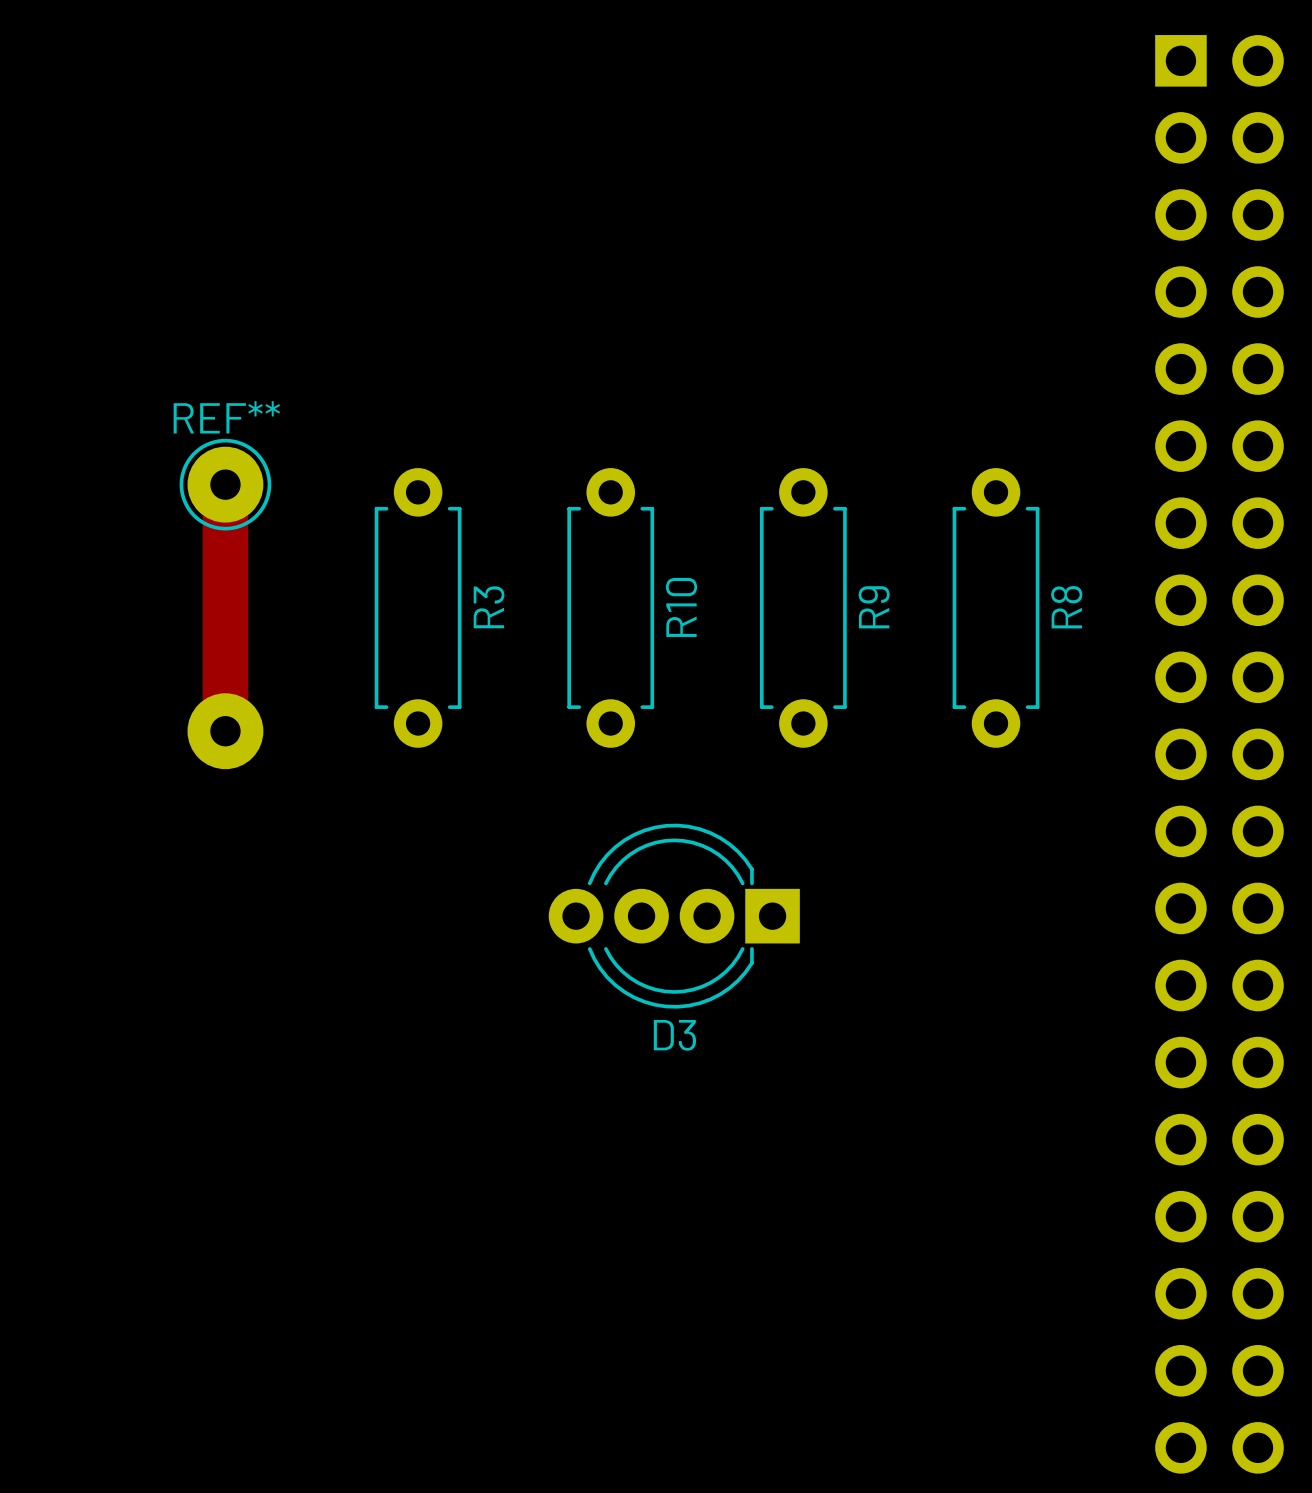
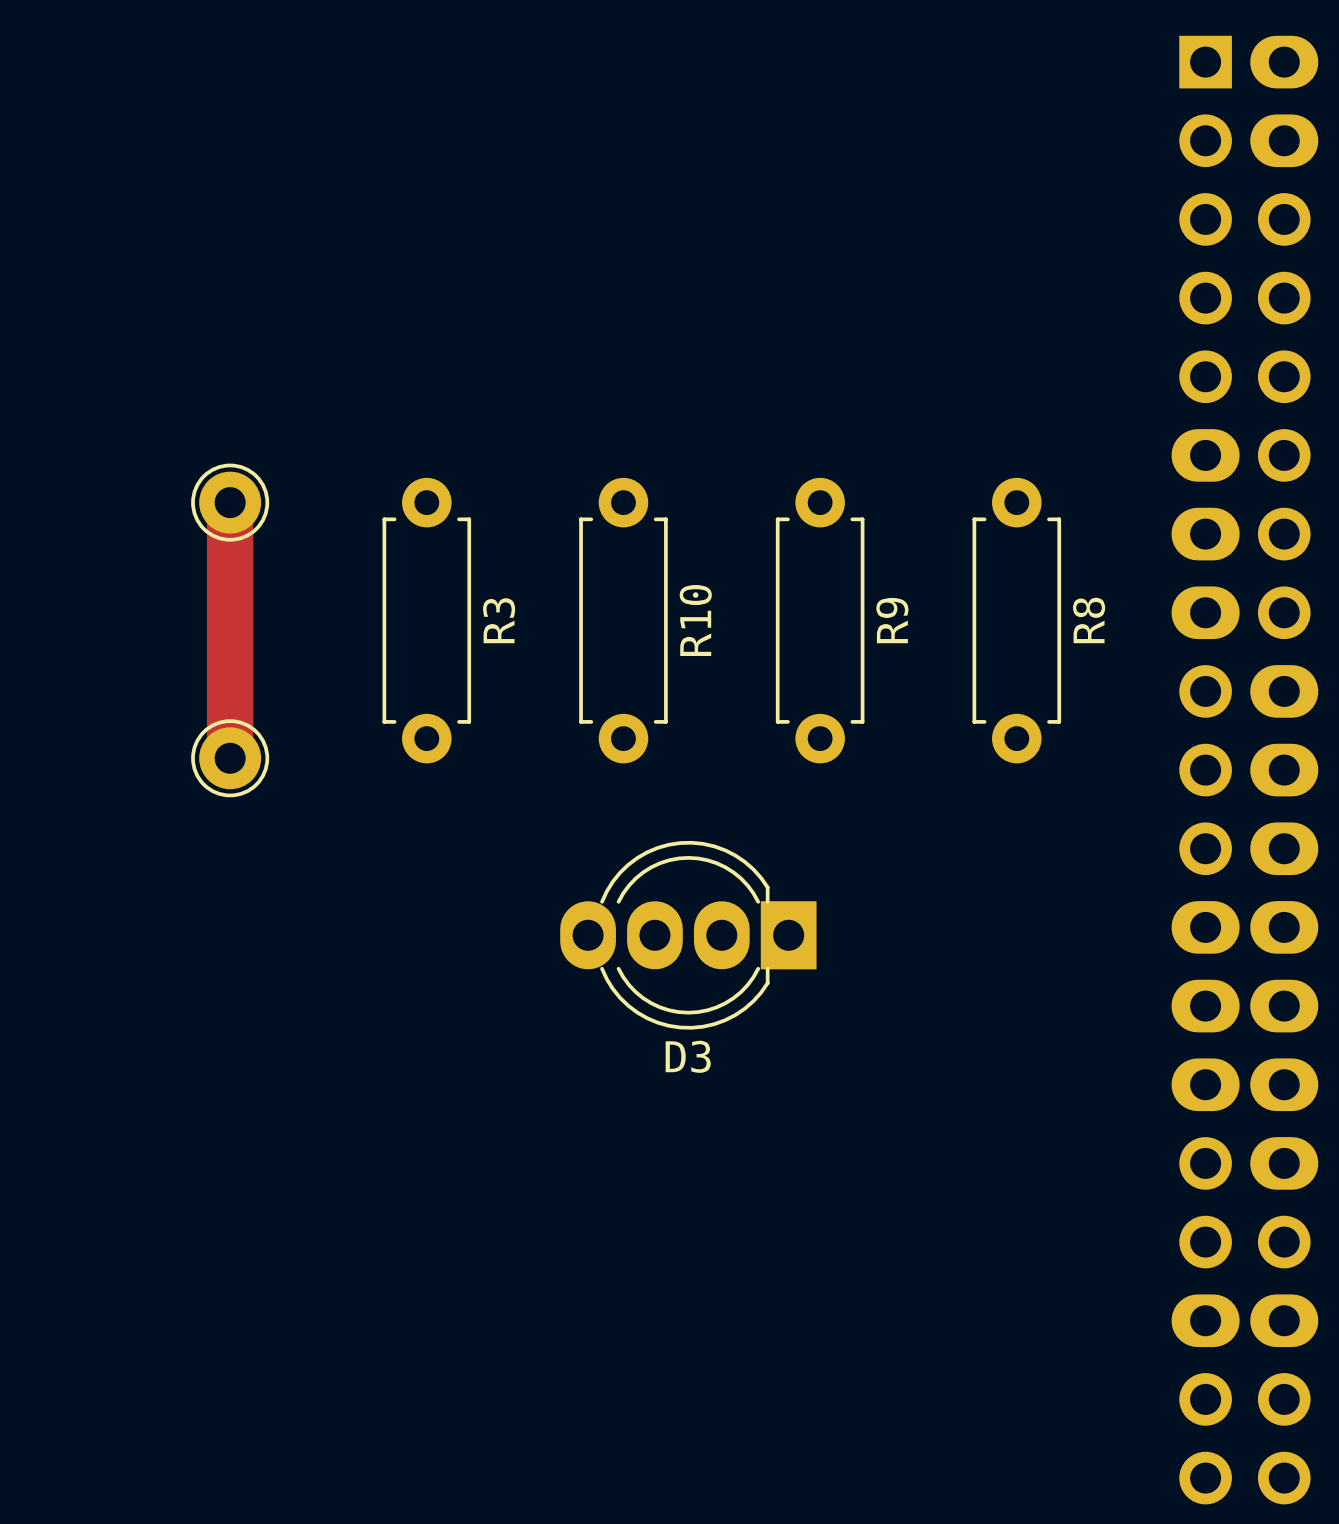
part footprint: [1155, 35, 1284, 1474] -> [1171, 35, 1319, 1505]
REF**: (225, 484) -> none
part: none -> (230, 502)
part footprint: [187, 693, 264, 770] -> [191, 719, 270, 798]
D3 footprint: [548, 823, 800, 1009] -> [560, 840, 817, 1030]

